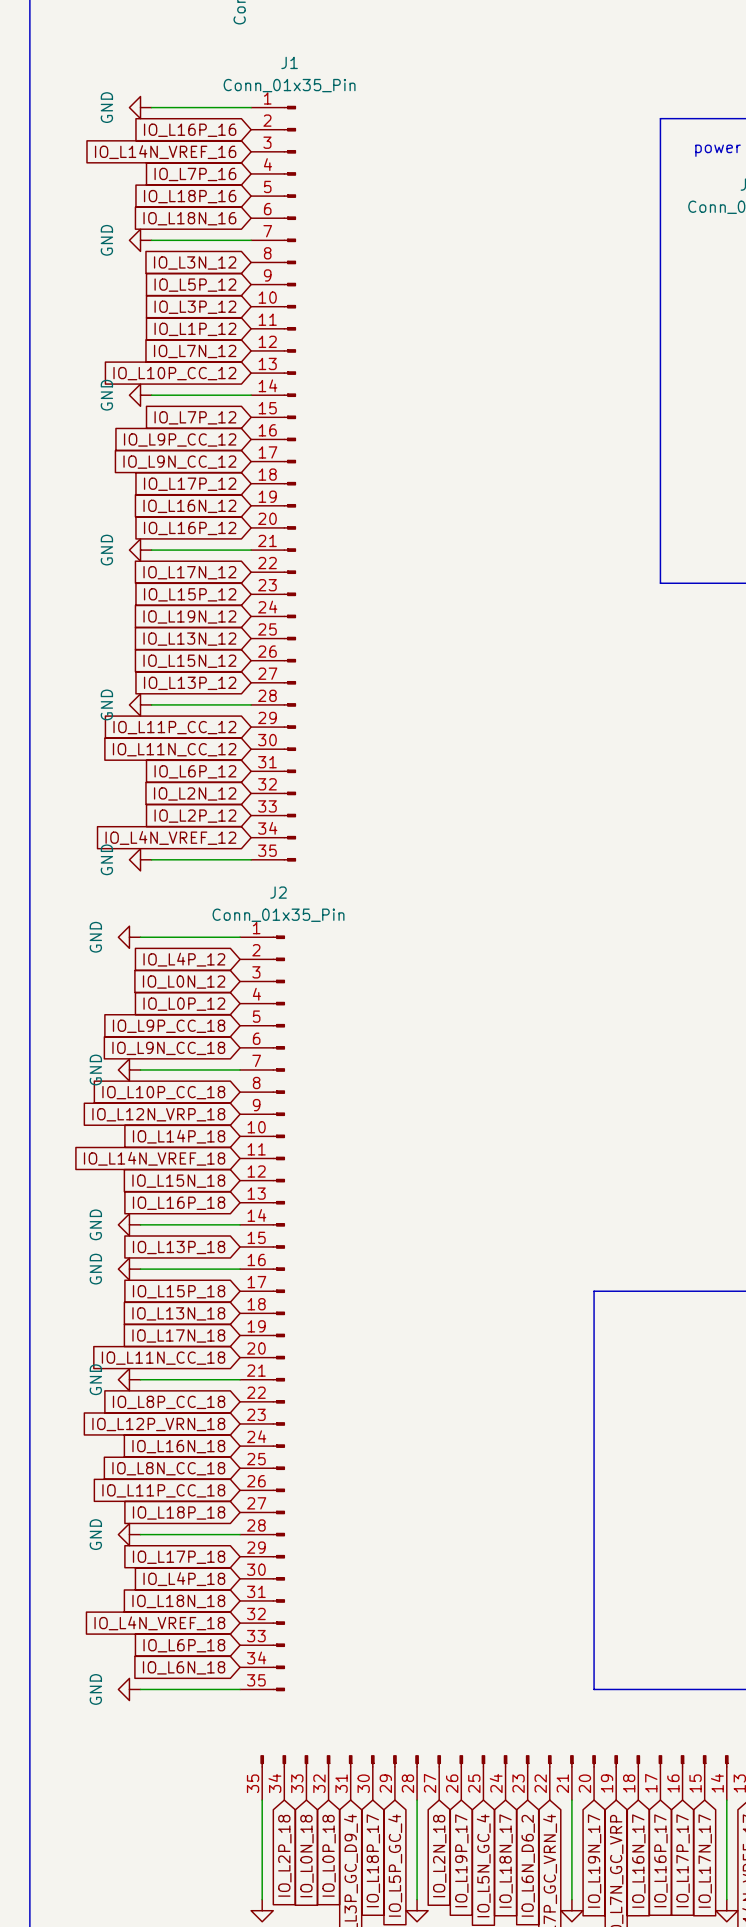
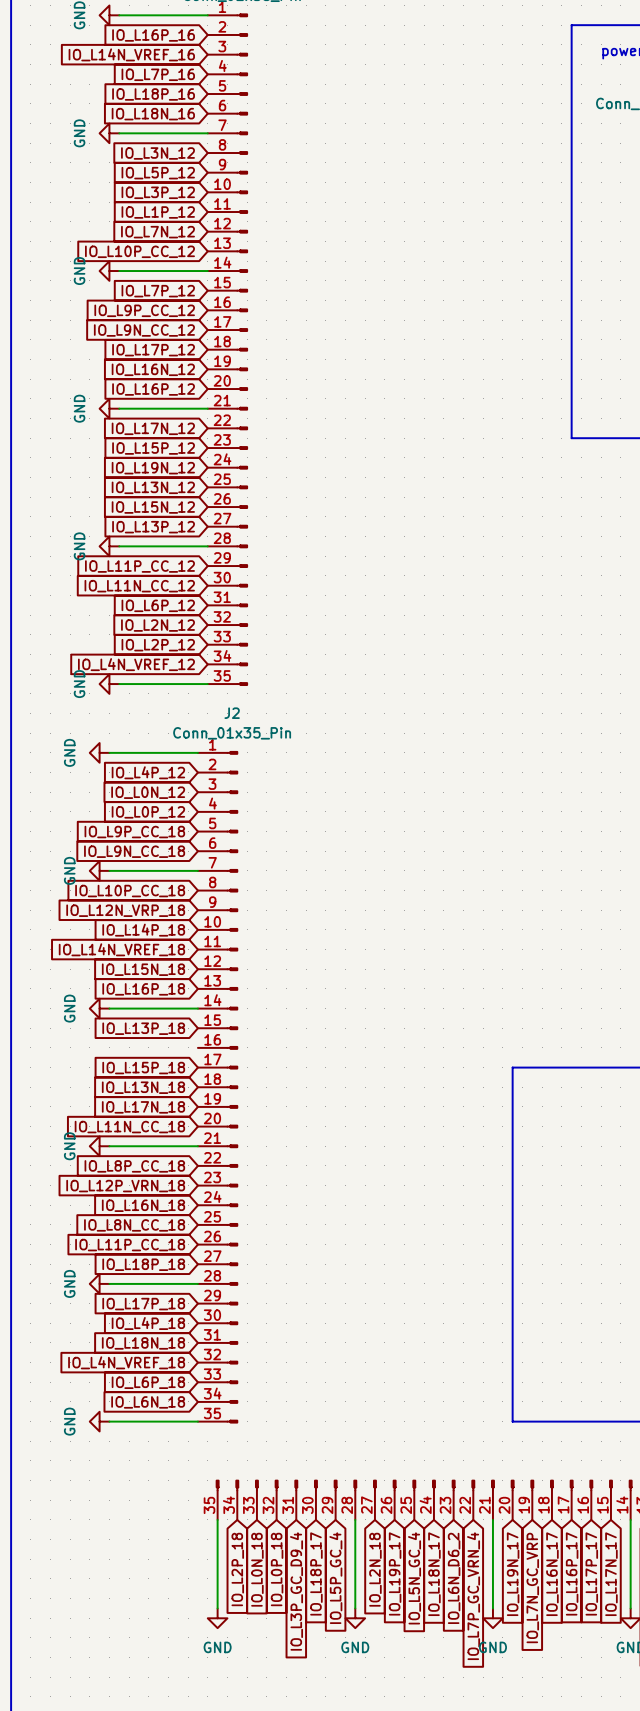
power symbol: GND (129, 1269) -> none
wire: (140, 1269) (240, 1269) -> none

